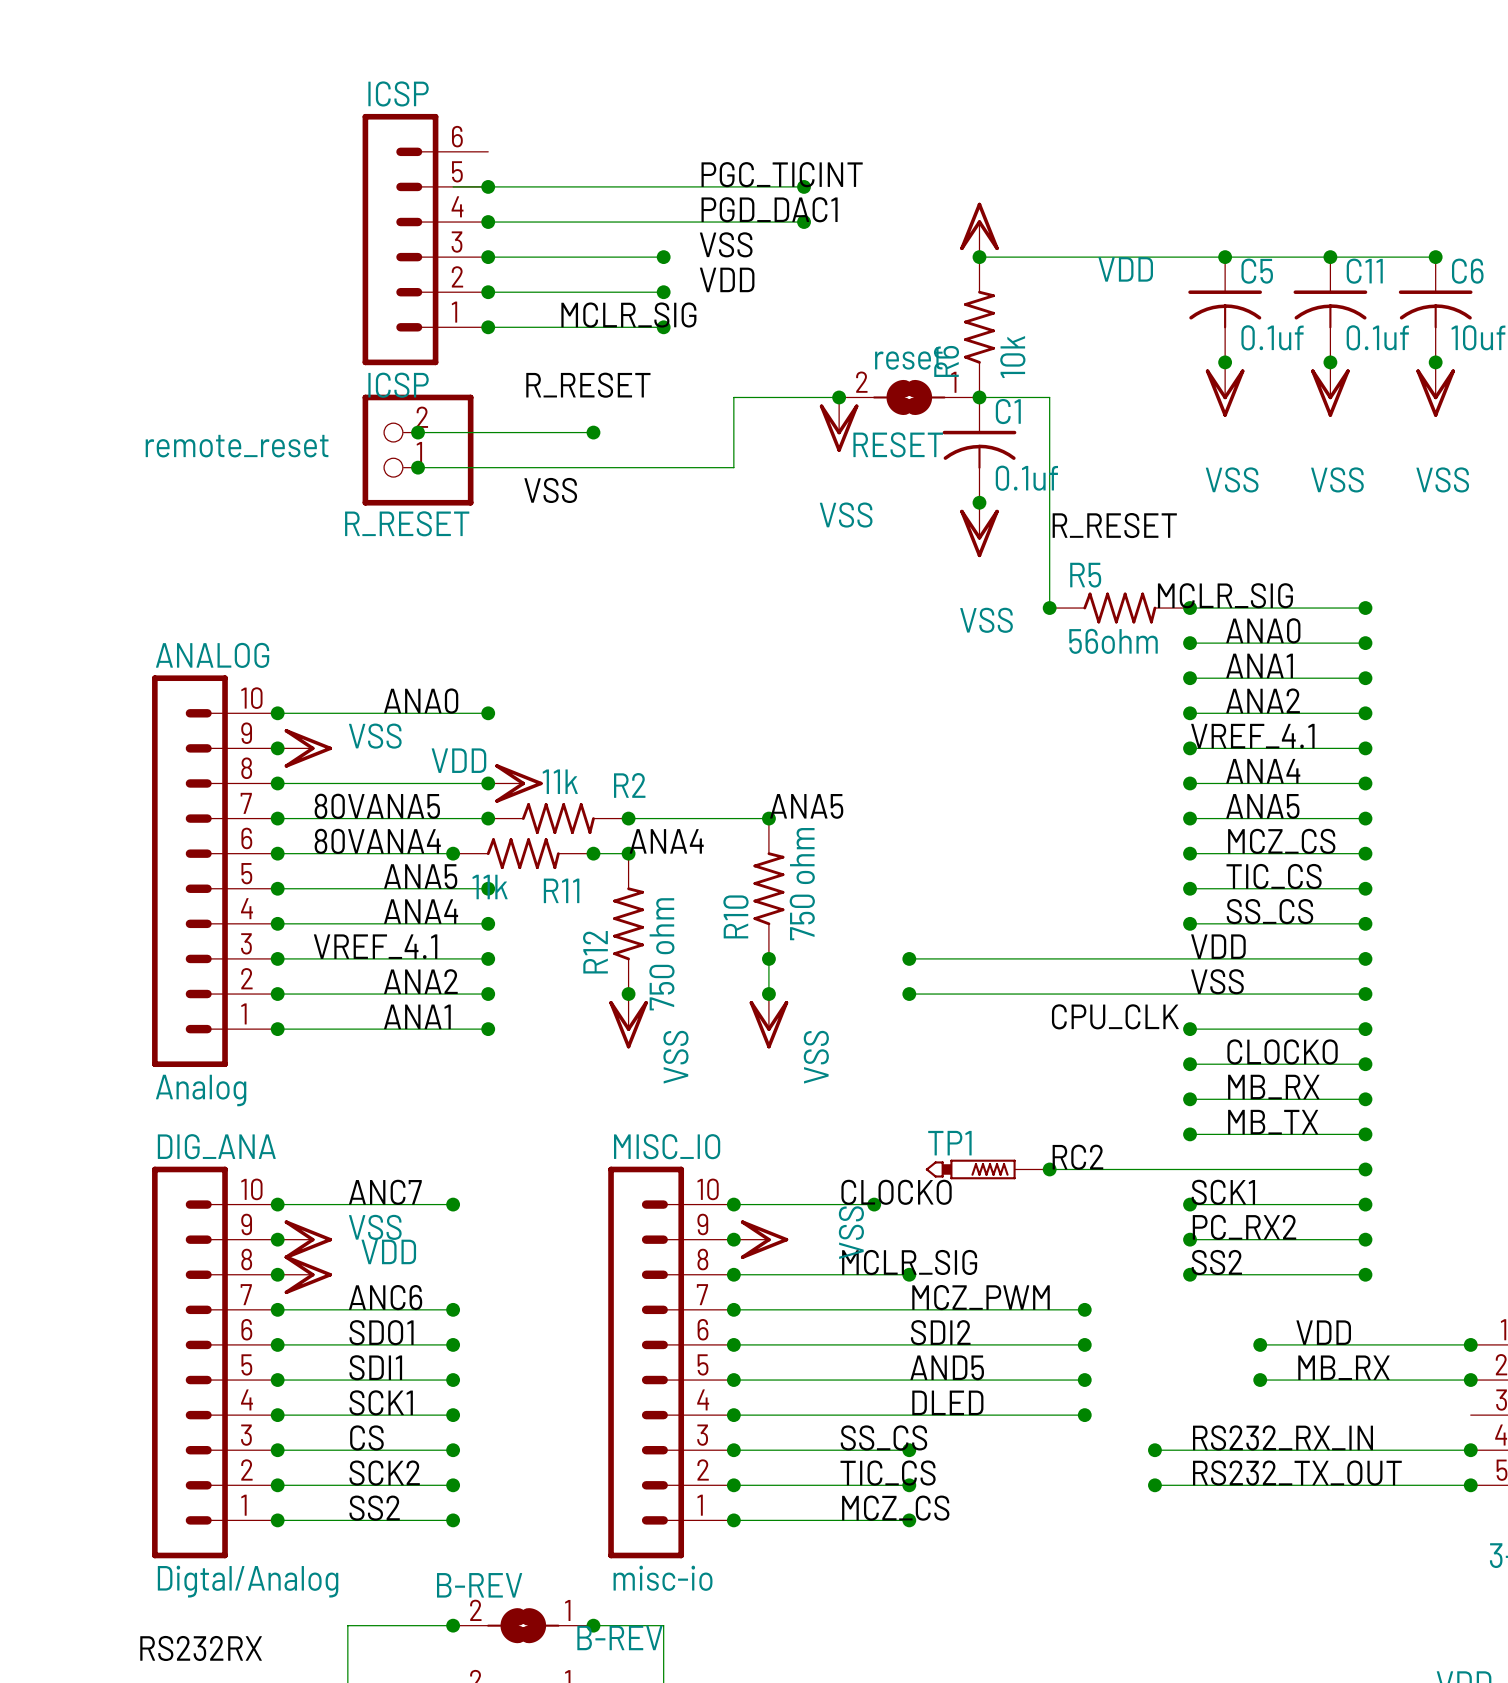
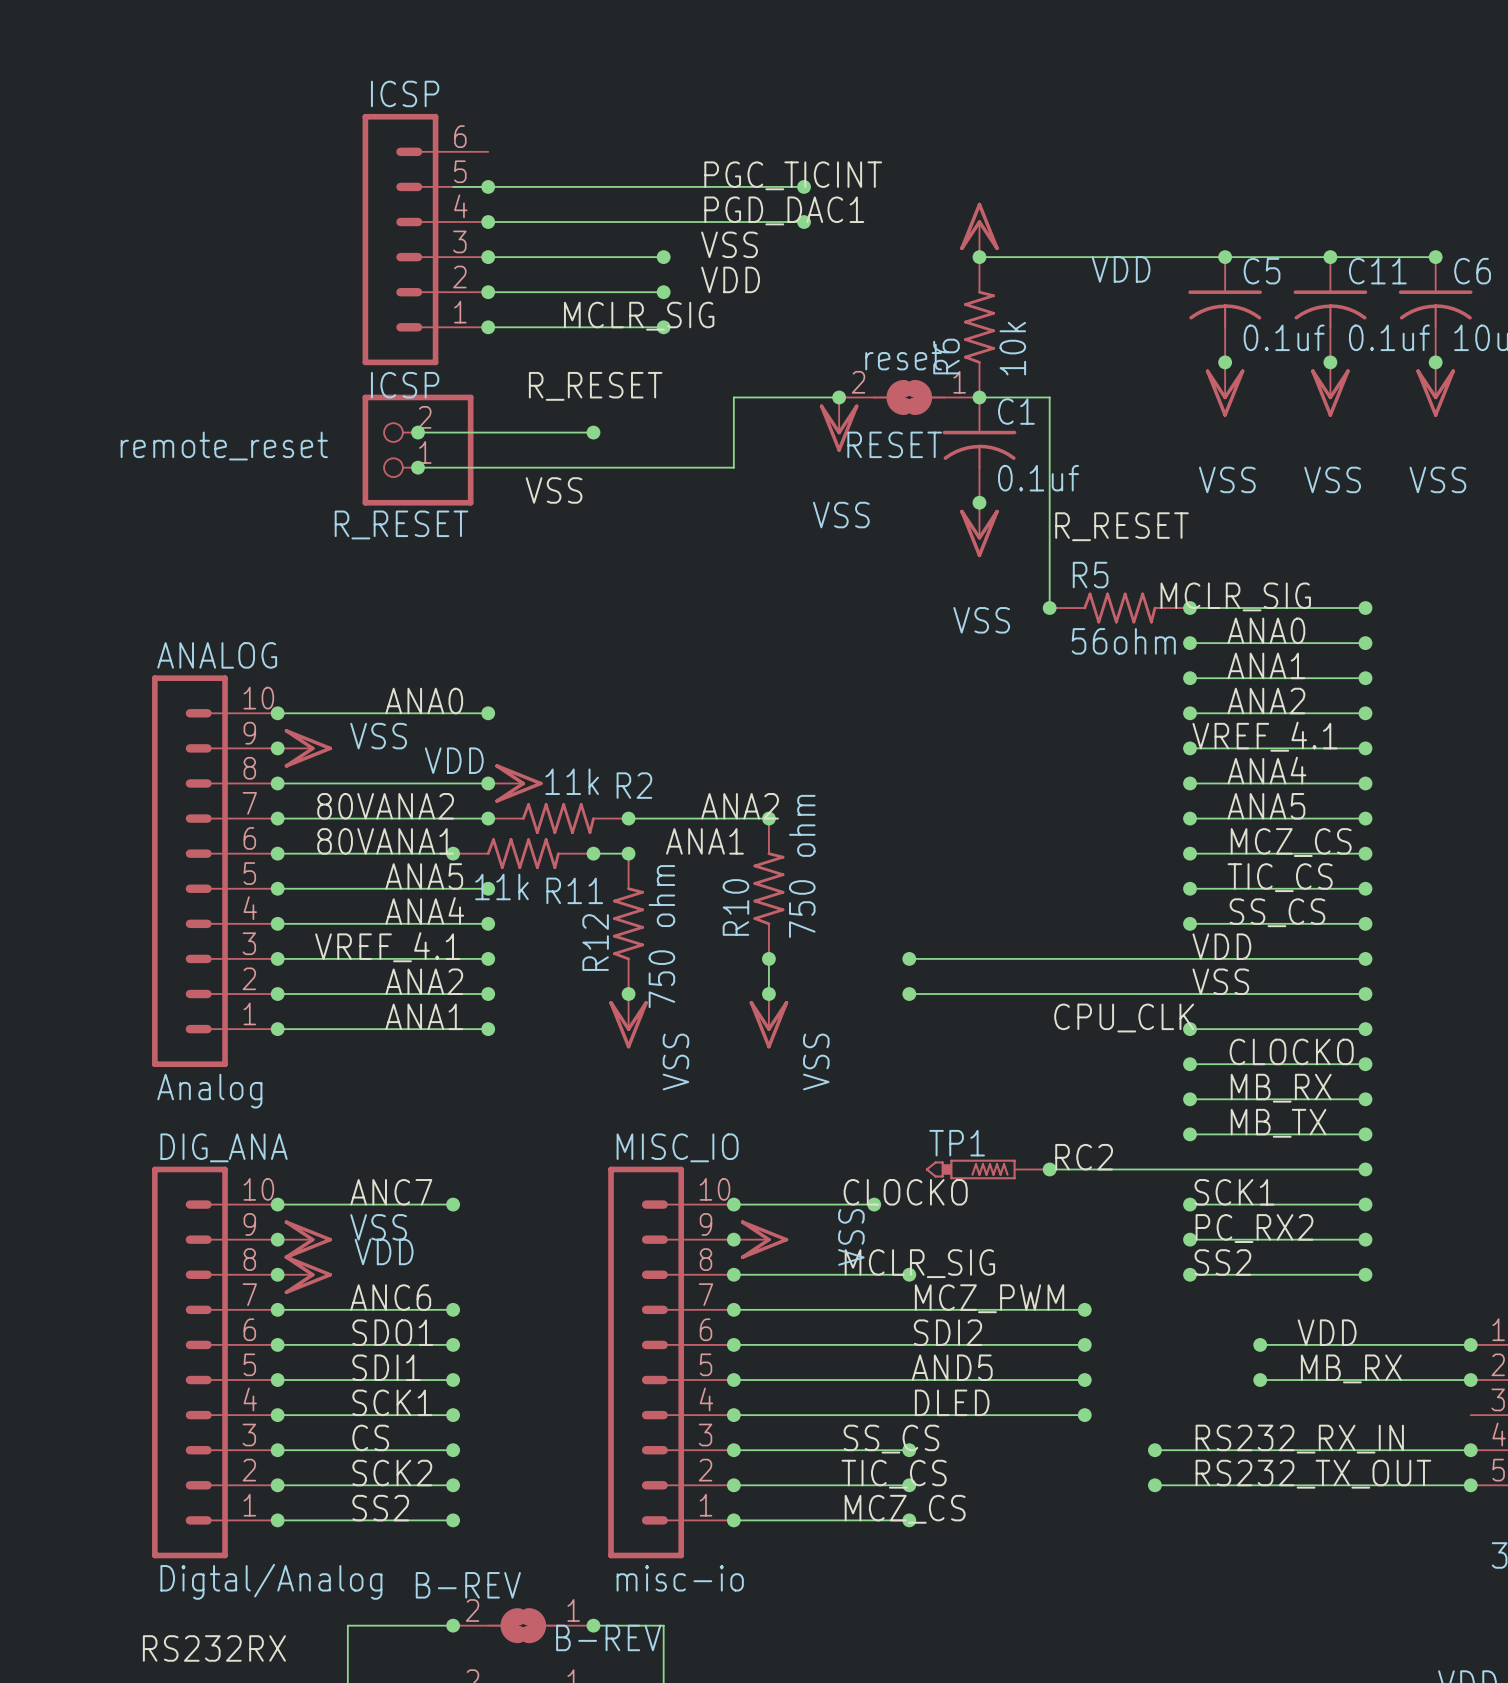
label: 80VANA5 (377, 806) -> 80VANA2 (385, 806)
label: none -> ANA2 (740, 806)
label: ANA5 (806, 806) -> none
label: 80VANA4 (377, 841) -> 80VANA1 (385, 841)
label: ANA4 (666, 841) -> ANA1 (704, 841)

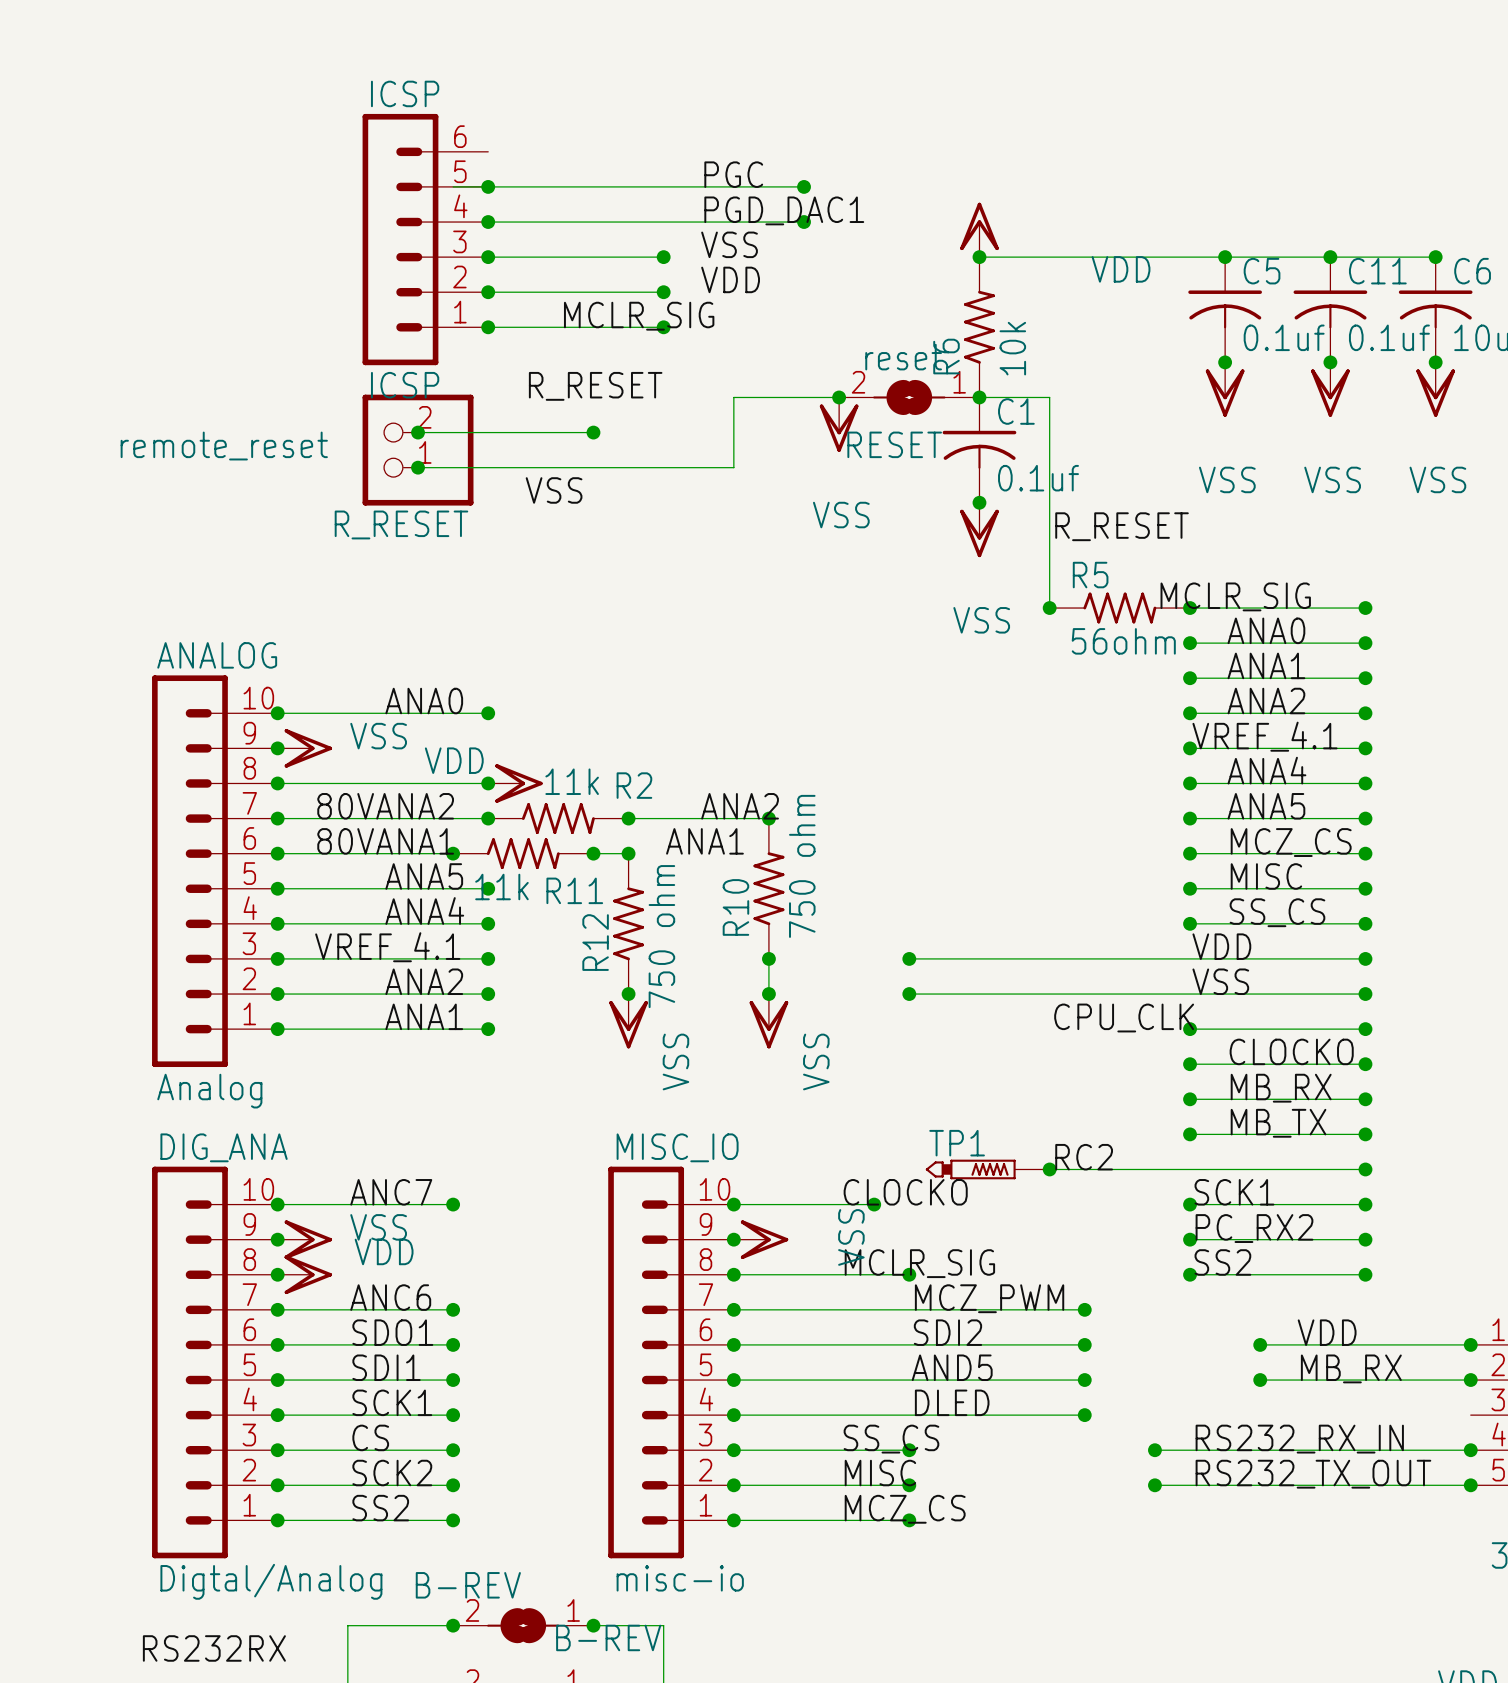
label: PGC_TICINT (793, 175) -> PGC (733, 174)
label: TIC_CS (1280, 877) -> MISC (1266, 876)
label: TIC_CS (894, 1474) -> MISC (880, 1473)

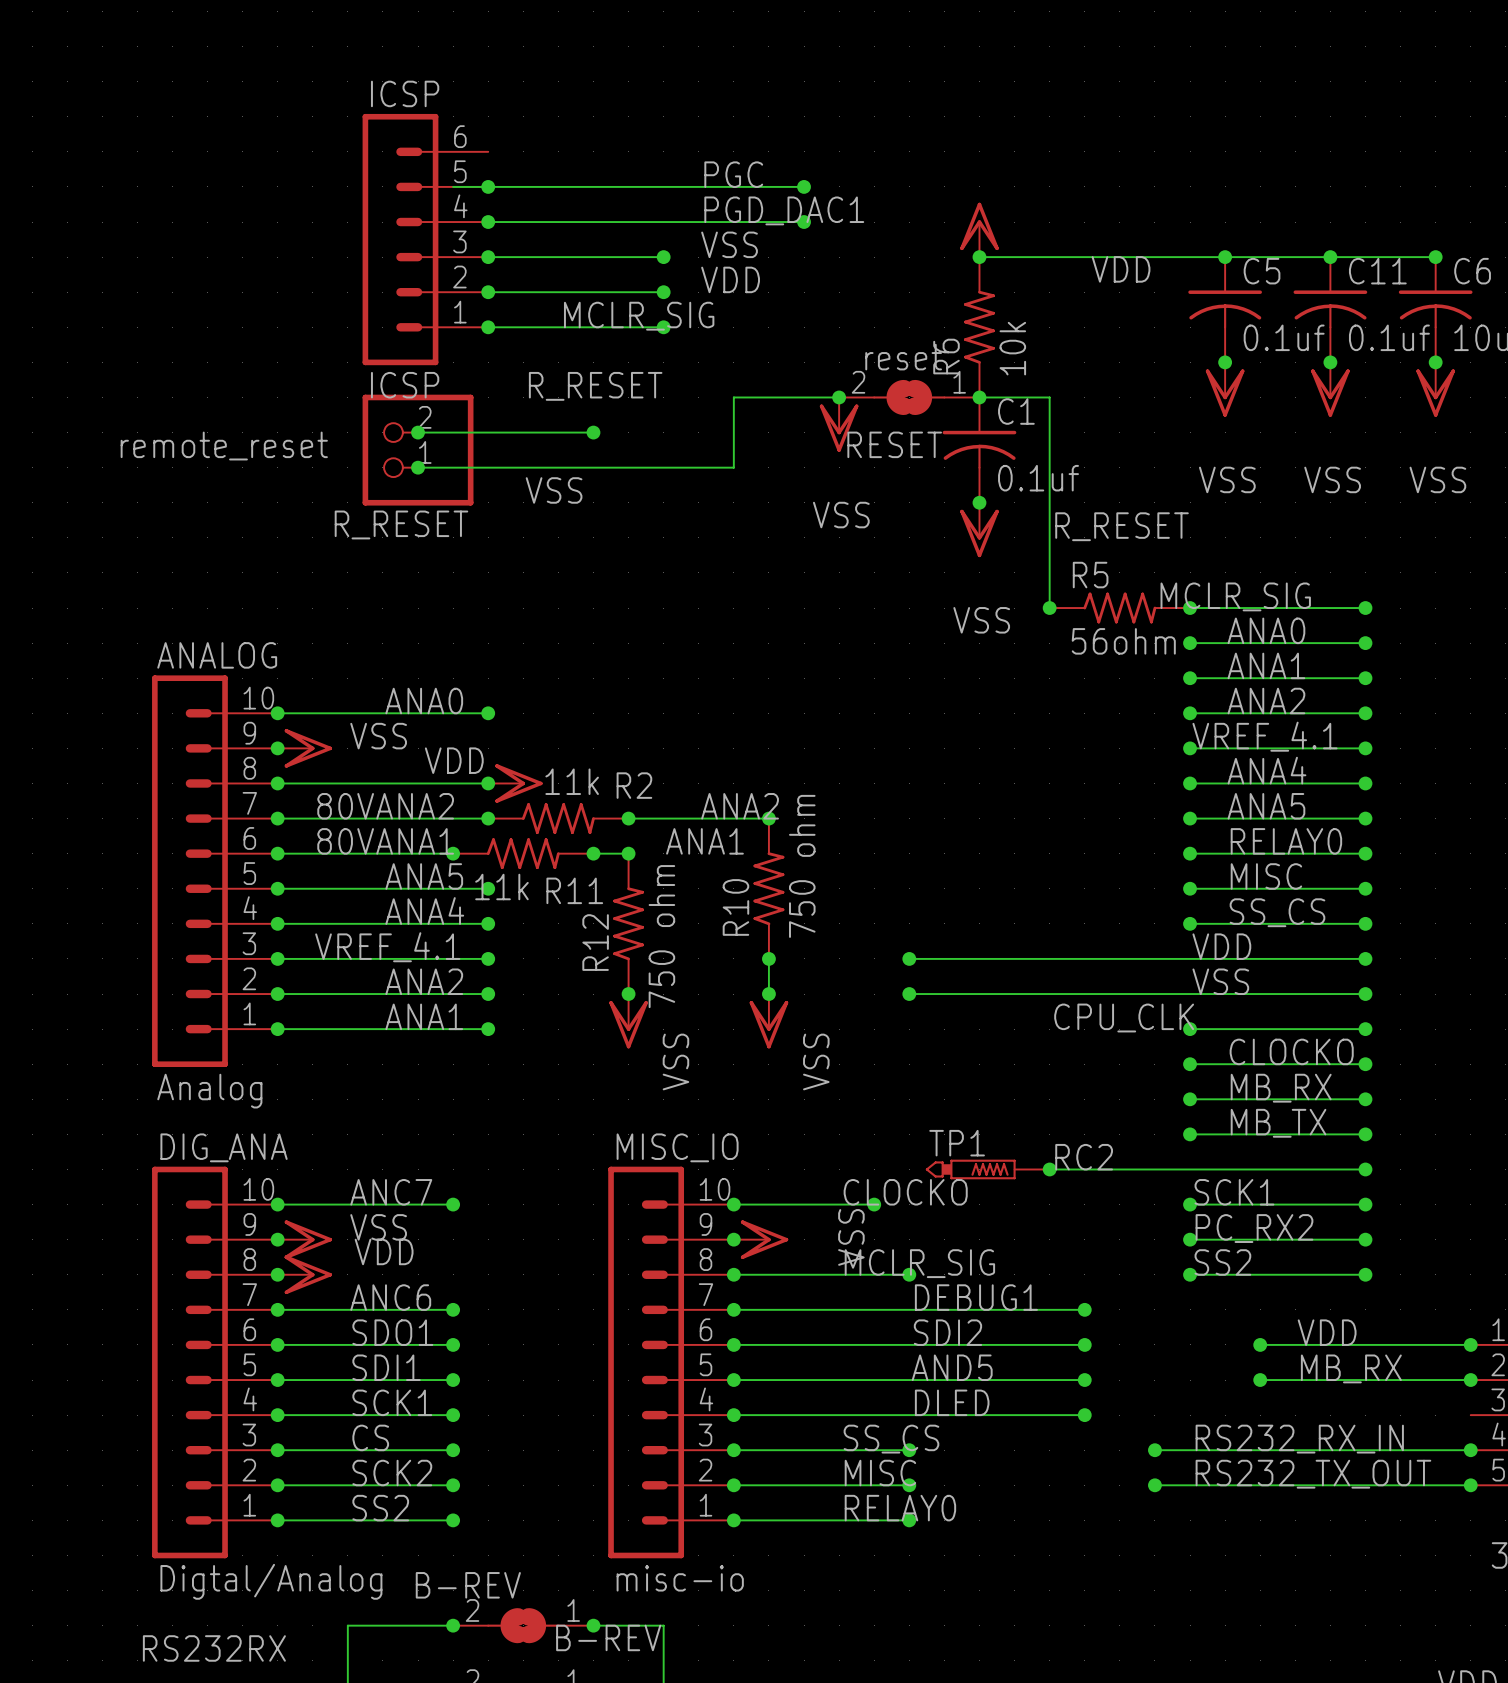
label: MCZ_CS (1291, 842) -> RELAY0 (1286, 841)
label: MCZ_PWM (989, 1298) -> DEBUG1 (976, 1297)
label: MCZ_CS (905, 1509) -> RELAY0 (900, 1508)

